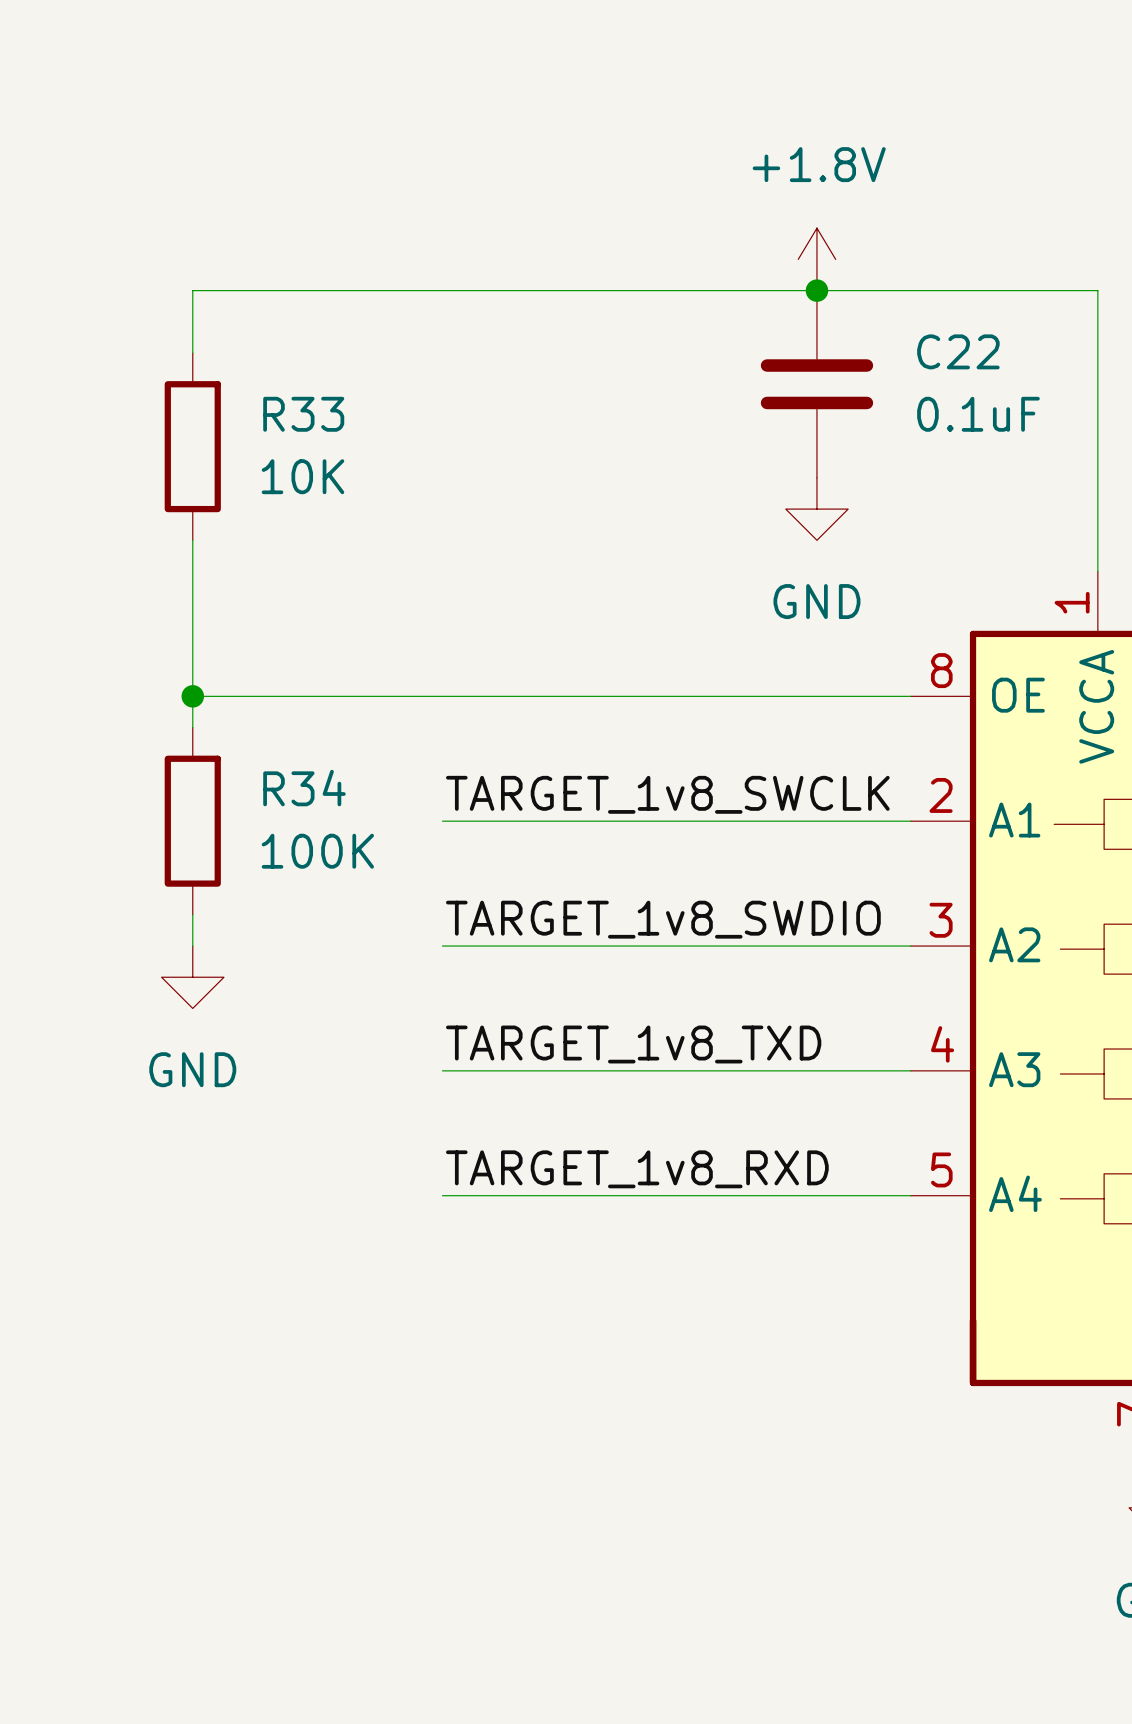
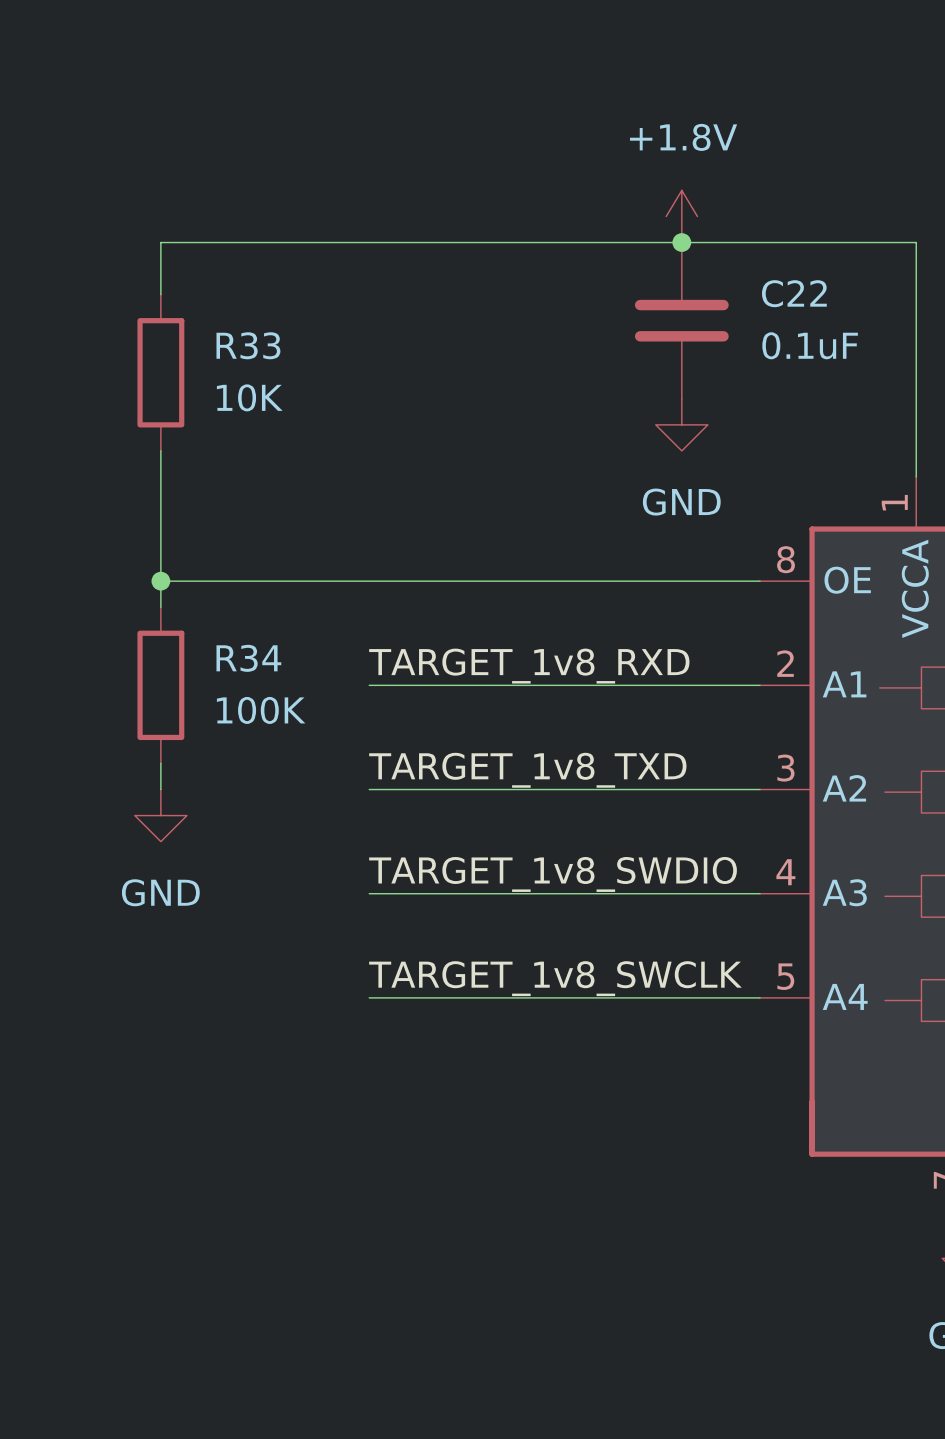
label: TARGET_1v8_SWCLK (667, 794) -> TARGET_1v8_RXD (529, 666)
label: TARGET_1v8_SWDIO (663, 919) -> TARGET_1v8_TXD (527, 770)
label: TARGET_1v8_TXD (633, 1044) -> TARGET_1v8_SWDIO (553, 874)
label: TARGET_1v8_RXD (637, 1169) -> TARGET_1v8_SWCLK (555, 978)

